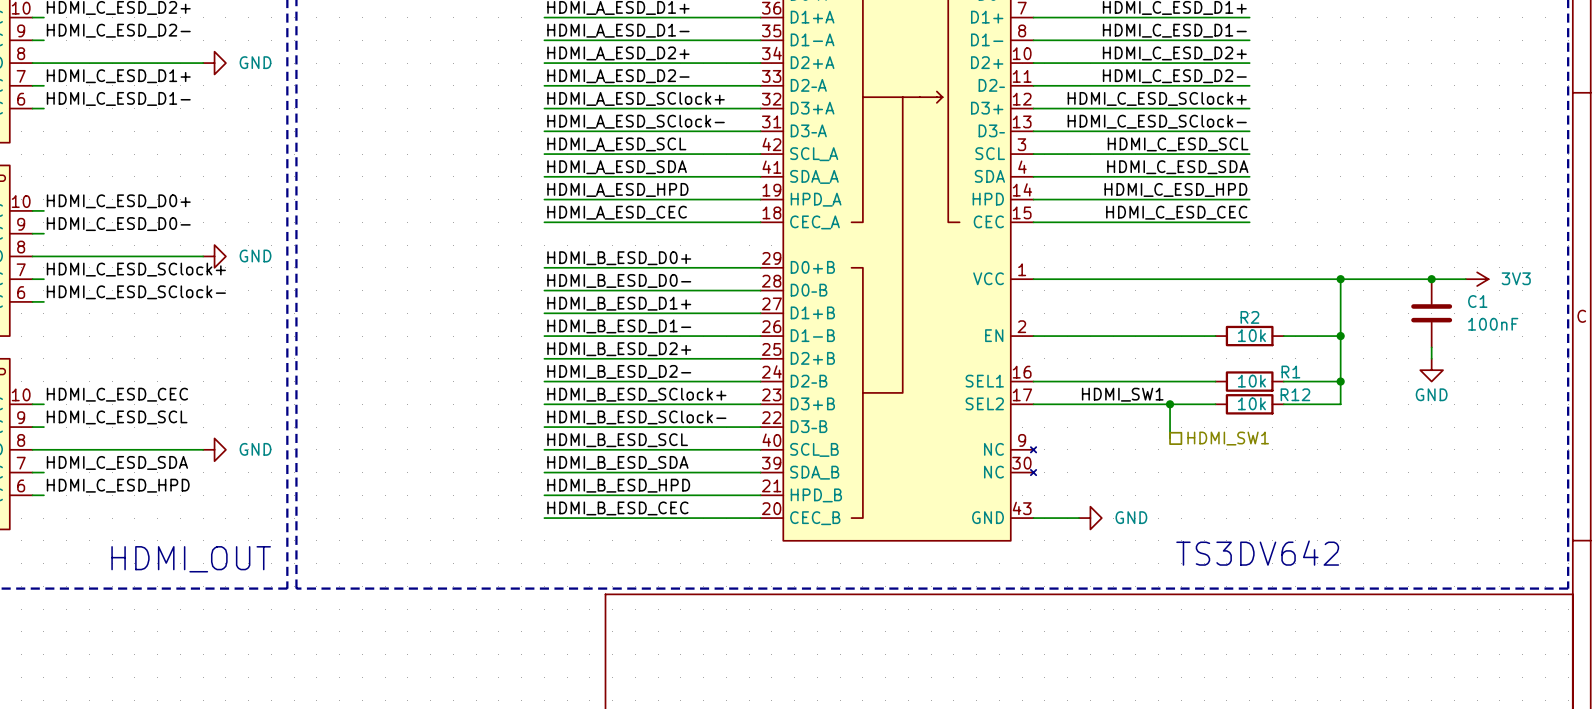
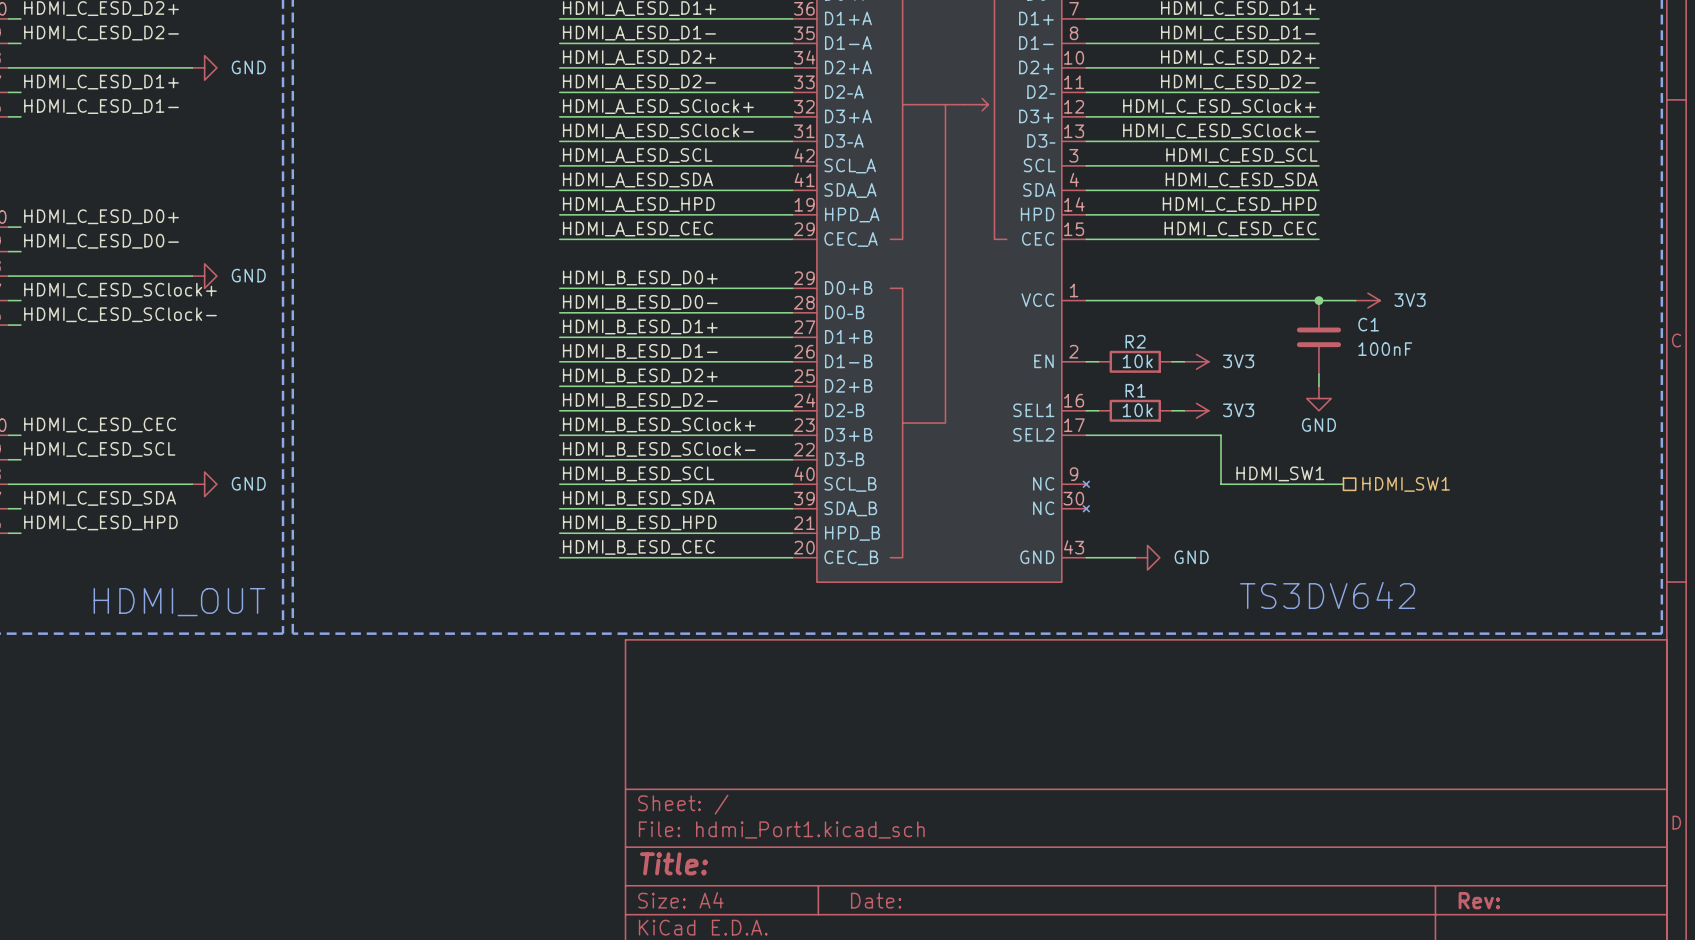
part pin number: 18 (771, 212) -> 29 (804, 229)
junction: none -> (1318, 300)
wire: (1283, 279) (1465, 279) -> none
power symbol: none -> 3V3 (1367, 300)
wire: (1340, 279) (1340, 404) (1283, 404) -> none
junction: (1340, 279) -> none
junction: (1431, 279) -> none
power symbol: 3V3 (1477, 279) -> none
C1 position: (1431, 313) -> (1318, 337)
wire: (1044, 336) (1113, 336) -> none
wire: (1124, 336) (1215, 336) -> none
power symbol: none -> 3V3 (1196, 361)
R2 position: (1249, 336) -> (1135, 361)
wire: (1283, 336) (1340, 336) -> none
junction: (1340, 336) -> none
wire: (1431, 347) (1431, 358) -> (1318, 374) (1318, 386)
power symbol position: GND (1431, 370) -> GND (1318, 398)
R1 name position: R1 (1290, 372) -> R1 (1135, 390)
wire: (1044, 381) (1113, 381) -> none
wire: (1124, 381) (1215, 381) -> none
power symbol: none -> 3V3 (1196, 410)
R1 position: (1249, 381) -> (1135, 410)
wire: (1283, 381) (1340, 381) -> none
junction: (1340, 381) -> none
label position: HDMI_SW1 (1122, 394) -> HDMI_SW1 (1280, 473)
wire: (1158, 404) (1215, 404) -> (1221, 435) (1221, 484) (1343, 484)
wire: (1170, 404) (1170, 438) -> none
junction: (1170, 404) -> none
R12: 10k (1249, 404) -> none
hierarchical label position: HDMI_SW1 (1228, 438) -> HDMI_SW1 (1406, 484)

